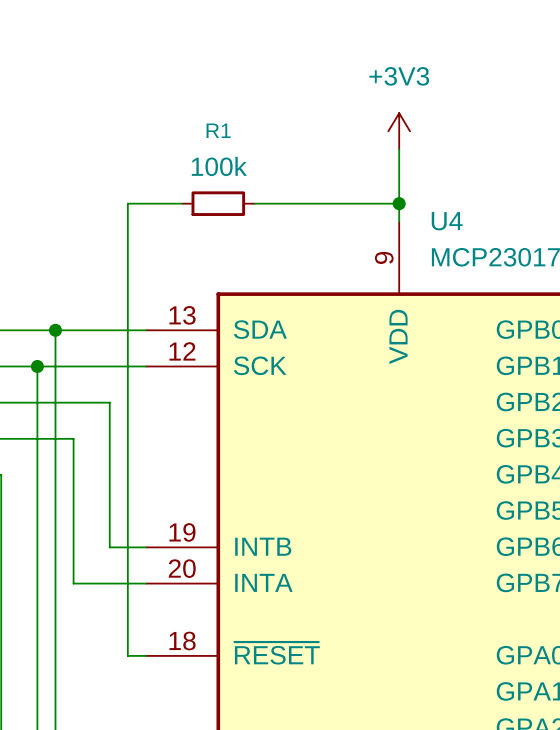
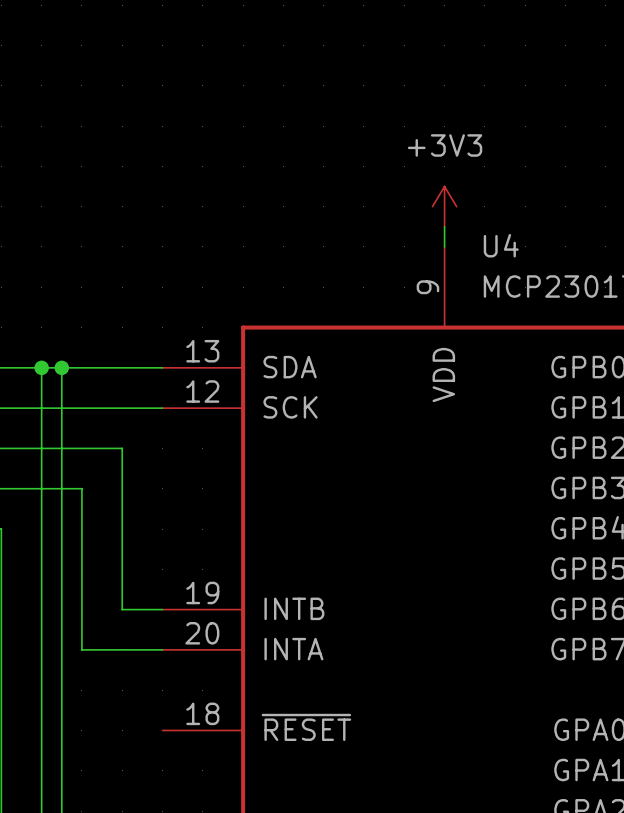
power symbol position: +3V3 (399, 131) -> +3V3 (444, 206)
wire: (399, 149) (399, 203) (254, 203) -> none
wire: (182, 203) (127, 203) (127, 655) (145, 655) -> none
R1: 100k (218, 203) -> none
junction: (399, 203) -> none
wire: none -> (41, 367) (41, 408)
junction position: (37, 366) -> (41, 367)

